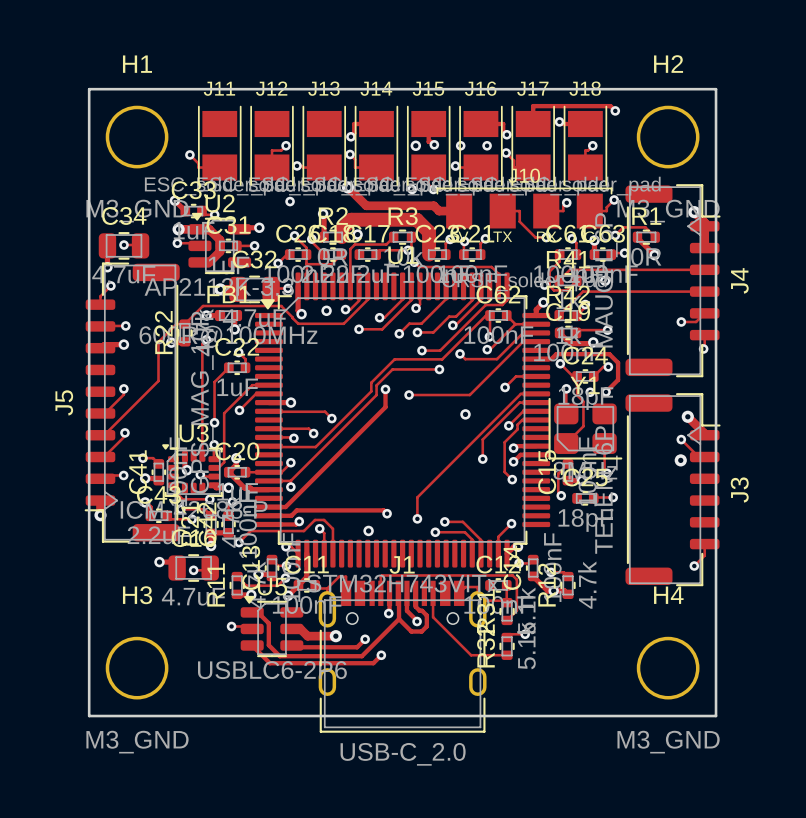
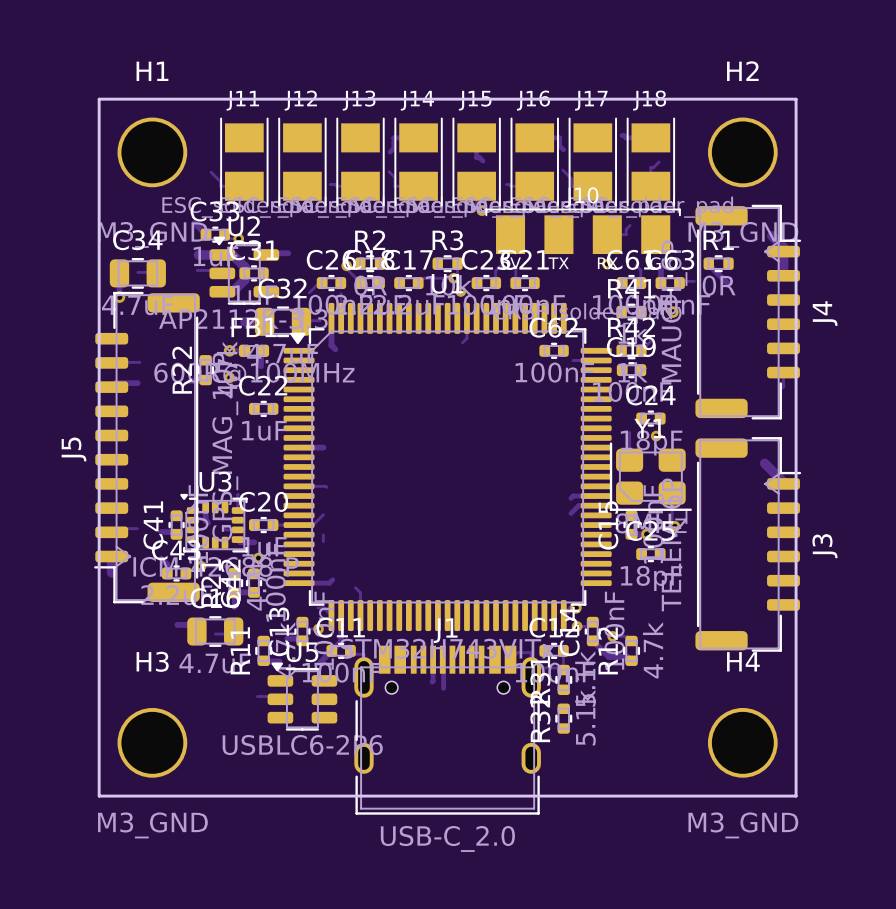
track: (615, 110) (610, 106) (533, 106) (533, 124) -> none
via: (615, 110) -> none
via: (559, 121) -> none
via: (506, 134) -> none
via: (350, 136) -> none
via: (434, 144) -> none
track: (286, 145) (281, 150) (272, 150) (272, 167) -> none
via: (286, 145) -> none
via: (415, 145) -> none
via: (460, 145) -> none
via: (487, 145) -> none
via: (592, 145) -> none
via: (506, 152) -> none
via: (189, 154) -> none
via: (350, 154) -> none
via: (297, 165) -> none
via: (455, 166) -> none
track: (347, 187) (366, 205) (433, 205) (439, 211) (459, 211) -> none
via: (347, 187) -> none
via: (412, 189) -> none
track: (614, 199) (606, 207) (606, 211) (589, 211) -> none
via: (614, 199) -> none
via: (174, 200) -> none
via: (290, 201) -> none
via: (566, 202) -> none
track: (502, 211) (519, 211) (519, 221) (535, 237) (546, 237) -> none
via: (694, 212) -> none
track: (323, 213) (324, 237) -> none
via: (323, 213) -> none
via: (259, 227) -> none
via: (178, 229) -> none
via: (357, 234) -> none
track: (294, 235) (306, 247) (306, 264) (331, 264) (341, 254) -> none
via: (294, 235) -> none
track: (615, 235) (623, 227) (645, 227) (655, 237) -> none
via: (615, 235) -> none
track: (341, 237) (341, 229) (351, 219) (416, 219) (429, 232) (429, 254) -> none
track: (393, 237) (386, 244) (354, 244) (350, 249) (350, 286) -> none
track: (485, 238) (480, 243) (480, 254) -> none
via: (485, 238) -> none
via: (572, 238) -> none
via: (450, 239) -> none
via: (594, 240) -> none
via: (464, 241) -> none
via: (177, 243) -> none
via: (124, 245) -> none
track: (236, 245) (254, 245) -> none
via: (254, 245) -> none
via: (624, 253) -> none
track: (559, 254) (559, 261) (549, 271) (549, 286) (554, 290) (567, 290) (576, 280) -> none
via: (654, 255) -> none
track: (414, 262) (419, 267) (491, 267) (498, 273) (498, 286) -> none
via: (278, 263) -> none
track: (704, 269) (570, 269) (559, 280) -> none
track: (110, 285) (100, 296) (100, 304) -> none
via: (110, 285) -> none
via: (544, 285) -> none
track: (359, 286) (359, 300) (350, 309) (345, 309) -> none
track: (367, 286) (367, 299) (343, 323) (298, 323) (281, 306) (203, 306) (184, 324) (176, 324) (158, 342) (158, 380) (104, 435) (100, 435) -> none
track: (402, 286) (402, 299) (384, 317) (379, 317) -> none
track: (411, 286) (411, 300) (382, 329) (359, 329) -> none
track: (446, 286) (446, 299) (421, 323) (409, 323) (399, 333) -> none
track: (472, 286) (472, 300) (456, 316) (449, 316) (433, 332) (417, 332) -> none
track: (480, 286) (480, 299) (455, 325) (452, 325) -> none
track: (507, 286) (507, 300) (502, 305) (485, 305) (440, 350) (421, 350) -> none
via: (288, 288) -> none
via: (220, 289) -> none
track: (704, 291) (583, 291) (559, 315) -> none
track: (543, 302) (536, 309) (536, 315) -> none
via: (543, 302) -> none
via: (585, 304) -> none
via: (416, 308) -> none
via: (345, 309) -> none
via: (326, 310) -> none
track: (704, 313) (696, 321) (681, 321) -> none
via: (301, 314) -> none
track: (506, 315) (515, 324) (490, 349) (487, 349) -> none
via: (379, 317) -> none
via: (681, 321) -> none
via: (125, 325) -> none
via: (452, 325) -> none
via: (234, 329) -> none
via: (359, 329) -> none
track: (607, 330) (579, 330) (576, 332) -> none
via: (607, 330) -> none
via: (417, 332) -> none
track: (536, 332) (523, 332) (496, 359) (465, 359) (460, 353) -> none
track: (559, 332) (570, 343) (593, 342) -> none
via: (399, 333) -> none
track: (489, 336) (490, 315) (486, 315) (442, 359) (394, 359) (371, 382) (371, 391) (315, 447) (268, 446) -> none
via: (489, 336) -> none
track: (206, 339) (202, 343) (202, 456) -> none
track: (536, 341) (523, 341) (469, 395) (409, 395) -> none
via: (171, 342) -> none
via: (593, 342) -> none
via: (123, 344) -> none
via: (703, 348) -> none
via: (487, 349) -> none
via: (421, 350) -> none
track: (238, 352) (245, 359) (245, 367) -> none
via: (238, 352) -> none
via: (460, 353) -> none
track: (536, 359) (551, 359) (556, 354) (609, 354) (618, 362) (618, 379) (606, 391) -> none
track: (560, 363) (573, 376) (577, 376) (577, 395) (583, 401) (583, 426) (566, 443) -> none
via: (560, 363) -> none
track: (608, 366) (603, 366) (593, 376) -> none
via: (608, 366) -> none
track: (228, 367) (214, 382) (214, 422) -> none
track: (439, 369) (392, 369) (376, 385) (376, 395) (290, 480) (268, 480) -> none
via: (439, 369) -> none
track: (536, 376) (516, 376) (505, 387) -> none
track: (268, 385) (252, 385) (224, 413) (224, 462) (218, 467) (213, 467) -> none
via: (505, 387) -> none
track: (123, 388) (123, 394) (105, 413) (100, 413) -> none
via: (123, 388) -> none
via: (566, 388) -> none
track: (385, 389) (385, 407) (285, 507) (268, 507) -> none
via: (385, 389) -> none
via: (606, 391) -> none
track: (268, 393) (255, 393) (239, 410) -> none
track: (536, 393) (520, 393) (417, 497) (417, 518) -> none
via: (409, 395) -> none
via: (290, 402) -> none
track: (536, 402) (519, 402) (482, 439) (482, 459) -> none
via: (239, 410) -> none
track: (268, 411) (325, 411) (331, 418) -> none
track: (536, 411) (523, 411) (508, 425) -> none
via: (465, 414) -> none
via: (687, 416) -> none
via: (331, 418) -> none
track: (536, 420) (522, 420) (517, 424) (517, 429) (504, 442) (504, 472) (512, 479) -> none
via: (214, 422) -> none
via: (508, 425) -> none
track: (268, 428) (308, 428) (313, 433) -> none
track: (124, 432) (124, 436) (104, 457) (100, 457) -> none
via: (124, 432) -> none
via: (313, 433) -> none
via: (293, 438) -> none
track: (681, 439) (698, 457) (704, 457) -> none
via: (681, 439) -> none
via: (214, 444) -> none
via: (513, 448) -> none
track: (142, 458) (153, 458) (158, 463) -> none
via: (142, 458) -> none
track: (236, 458) (236, 464) (228, 472) (244, 487) (268, 489) -> none
via: (236, 458) -> none
via: (482, 459) -> none
via: (680, 460) -> none
via: (513, 461) -> none
via: (290, 462) -> none
track: (568, 463) (558, 473) (558, 492) (561, 495) -> none
via: (187, 470) -> none
via: (200, 474) -> none
via: (123, 475) -> none
via: (145, 478) -> none
via: (512, 479) -> none
track: (173, 485) (173, 489) (182, 499) (209, 499) -> none
via: (228, 487) -> none
via: (290, 487) -> none
via: (561, 495) -> none
track: (613, 497) (593, 498) -> none
via: (613, 497) -> none
via: (209, 499) -> none
via: (145, 502) -> none
track: (387, 513) (383, 510) (296, 510) (291, 515) (268, 515) -> none
via: (387, 513) -> none
via: (100, 515) -> none
track: (167, 515) (170, 519) (192, 519) -> none
via: (417, 518) -> none
via: (192, 519) -> none
via: (299, 521) -> none
track: (444, 521) (462, 521) (480, 539) (480, 553) -> none
via: (444, 521) -> none
track: (511, 523) (498, 536) (498, 553) -> none
via: (511, 523) -> none
via: (319, 528) -> none
via: (368, 530) -> none
track: (435, 532) (464, 532) (472, 539) (472, 553) -> none
via: (435, 532) -> none
track: (239, 542) (250, 531) (303, 531) (315, 519) (324, 519) (332, 528) (332, 553) -> none
via: (239, 542) -> none
track: (704, 544) (704, 555) (694, 566) -> none
via: (211, 545) -> none
via: (285, 546) -> none
via: (159, 562) -> none
via: (694, 566) -> none
via: (193, 570) -> none
via: (258, 574) -> none
track: (237, 576) (246, 585) (277, 585) (285, 578) -> none
via: (285, 578) -> none
track: (327, 588) (339, 576) (346, 576) (346, 593) -> none
via: (553, 590) -> none
track: (380, 593) (382, 575) (512, 575) (516, 579) (516, 610) (507, 620) -> none
track: (406, 593) (406, 610) (417, 621) -> none
track: (415, 593) (415, 606) (426, 615) (426, 626) (421, 631) (411, 631) (399, 619) (361, 656) (279, 656) (268, 645) (268, 623) (257, 612) (252, 612) -> none
track: (433, 593) (433, 617) (471, 655) (507, 655) -> none
via: (251, 594) -> none
via: (288, 595) -> none
via: (388, 613) -> none
via: (417, 621) -> none
via: (231, 626) -> none
track: (291, 628) (300, 628) (307, 636) (335, 636) -> none
track: (525, 634) (510, 634) (507, 637) -> none
via: (525, 634) -> none
via: (335, 636) -> none
track: (365, 639) (357, 647) (293, 647) (291, 645) -> none
via: (365, 639) -> none
track: (252, 645) (269, 663) (373, 663) (381, 655) -> none
via: (381, 655) -> none

